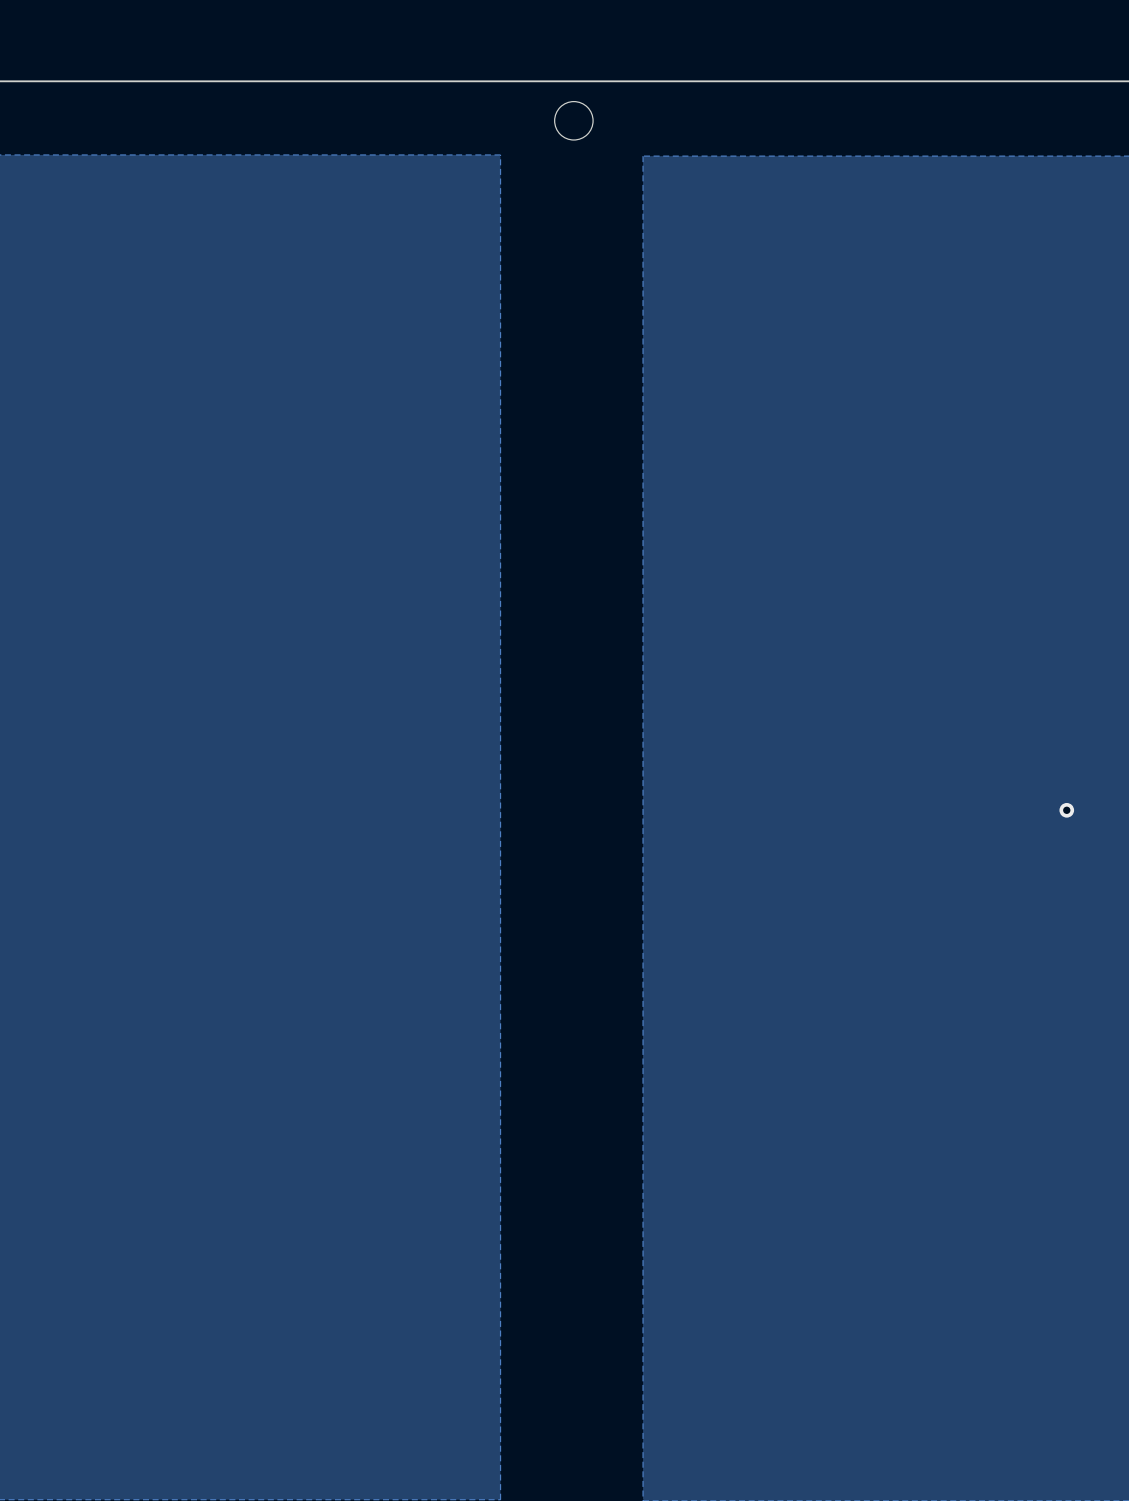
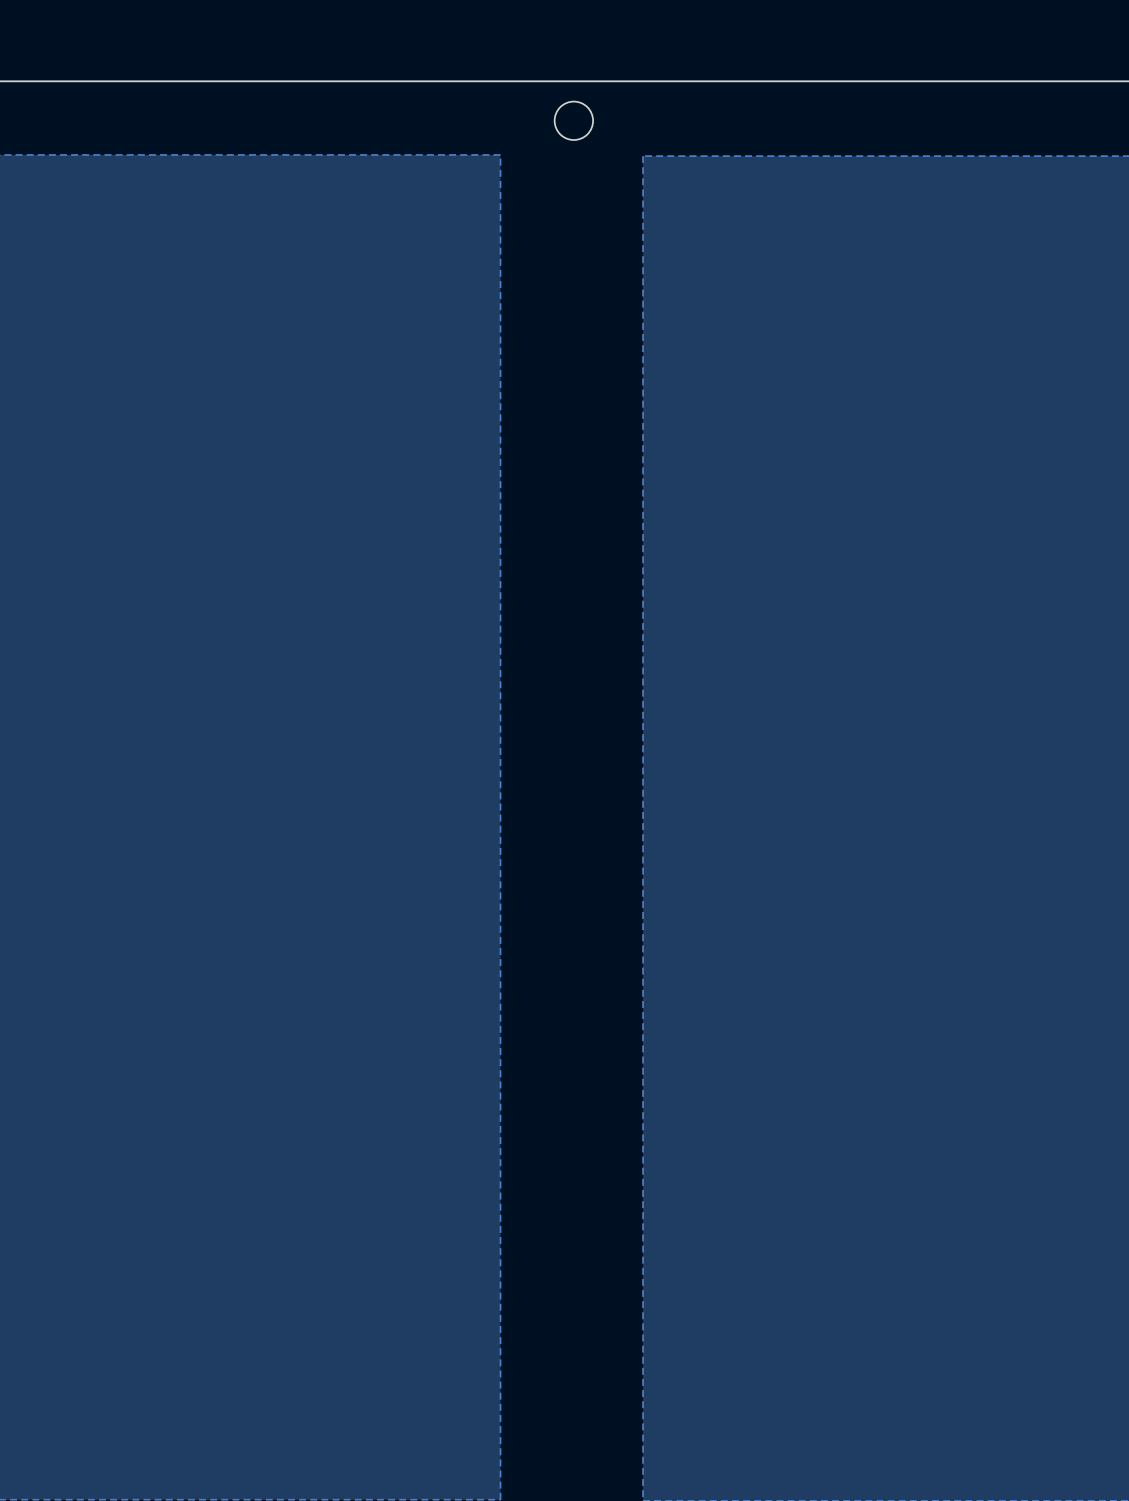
via: (1066, 810) -> none

